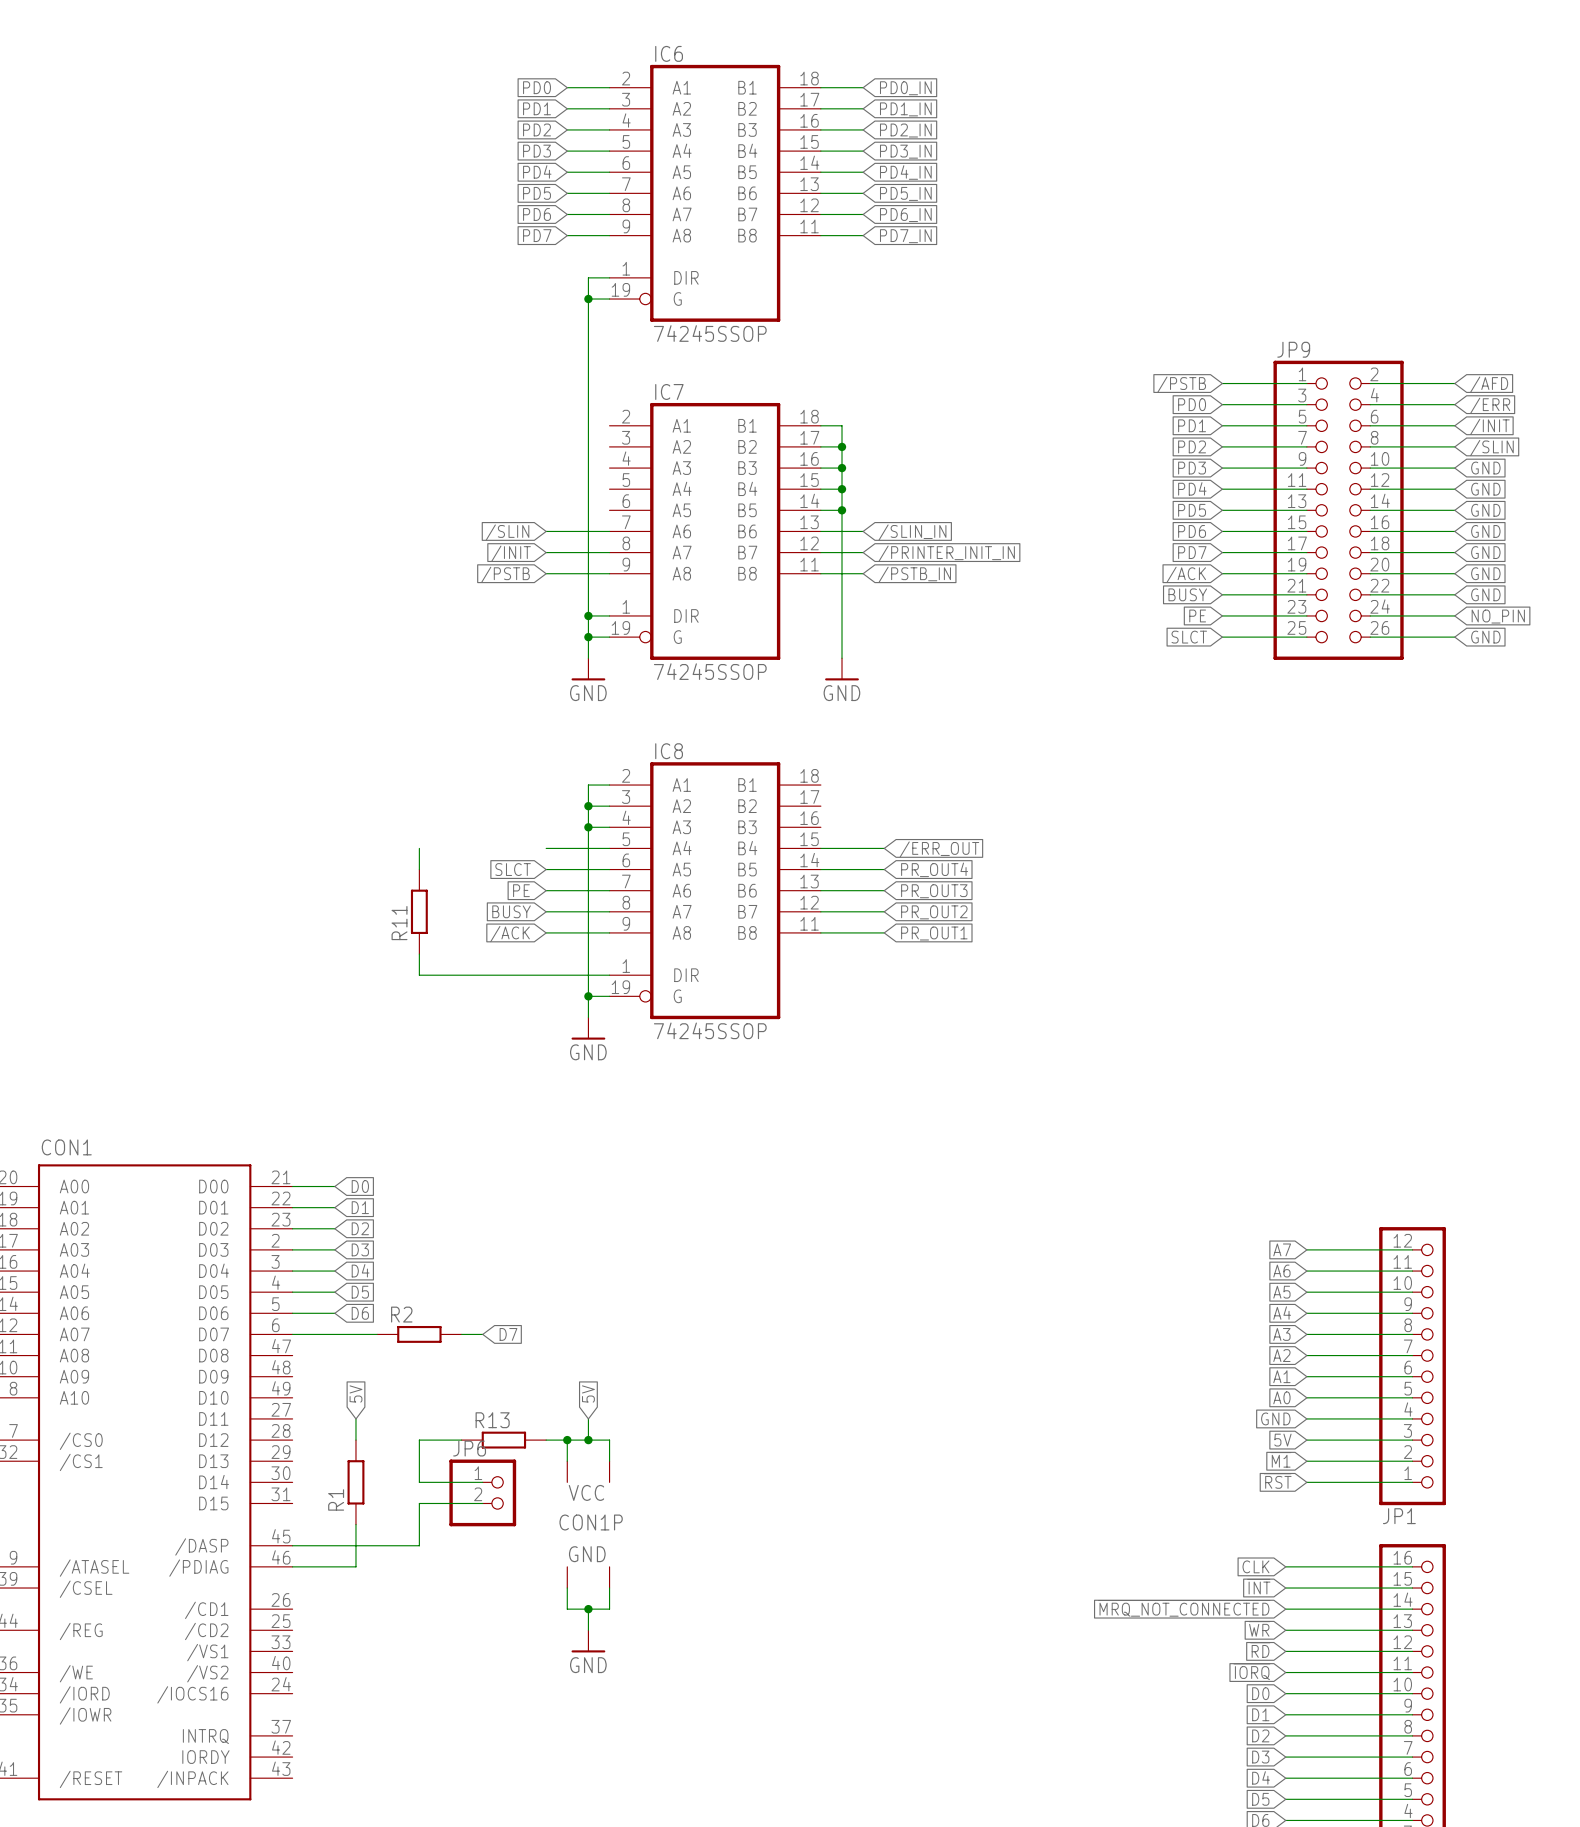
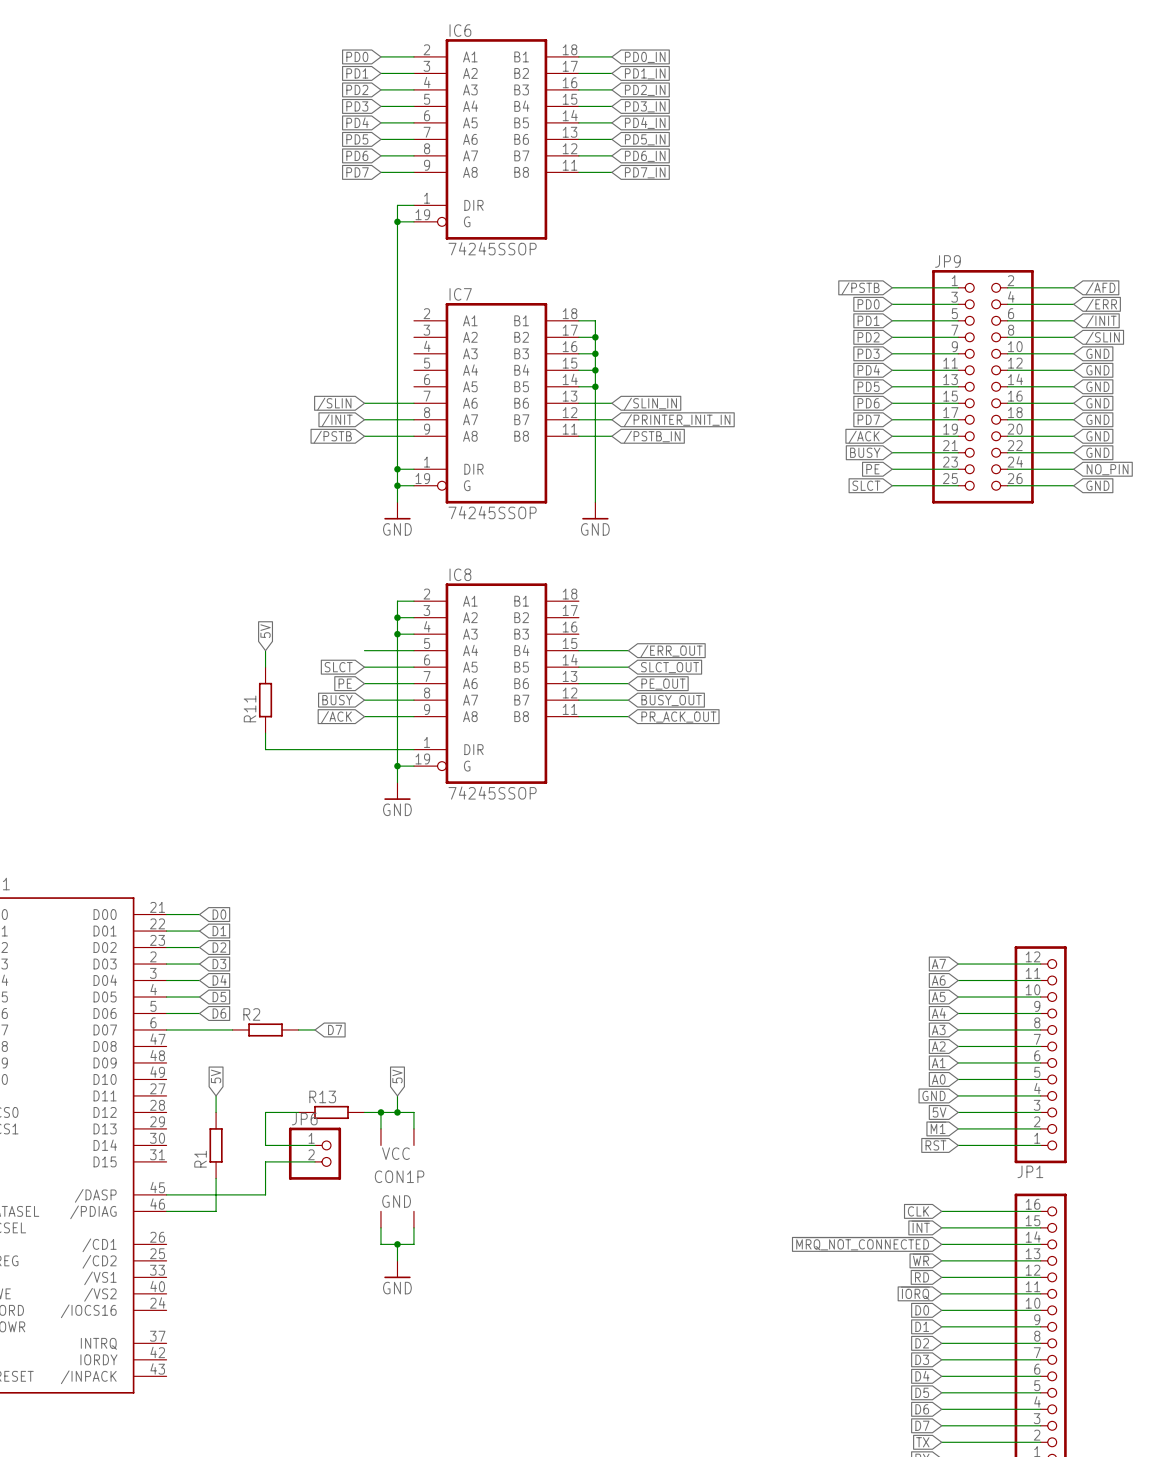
global label: none -> 5V (265, 631)
global label: PR_OUT4 (934, 869) -> SLCT_OUT (670, 667)
global label: PR_OUT3 (934, 891) -> PE_OUT (663, 684)
global label: PR_OUT2 (934, 912) -> BUSY_OUT (671, 700)
global label: PR_OUT1 (934, 933) -> PR_ACK_OUT (678, 717)

